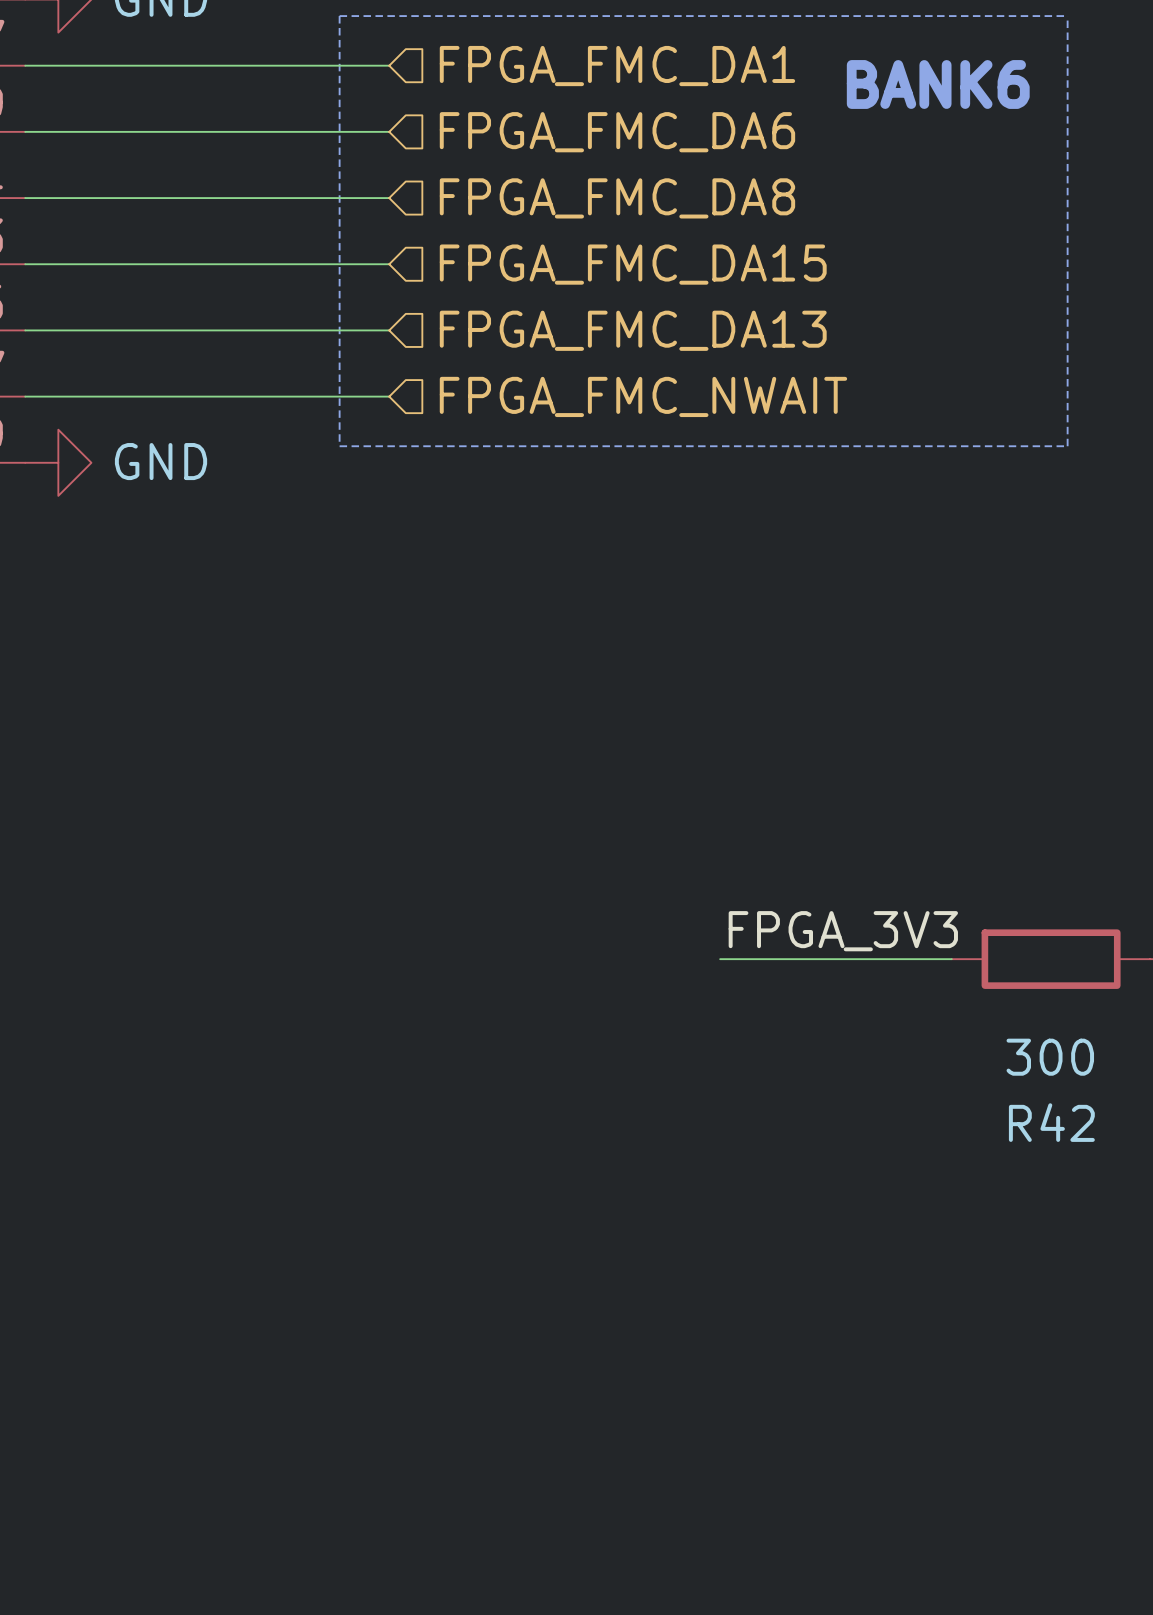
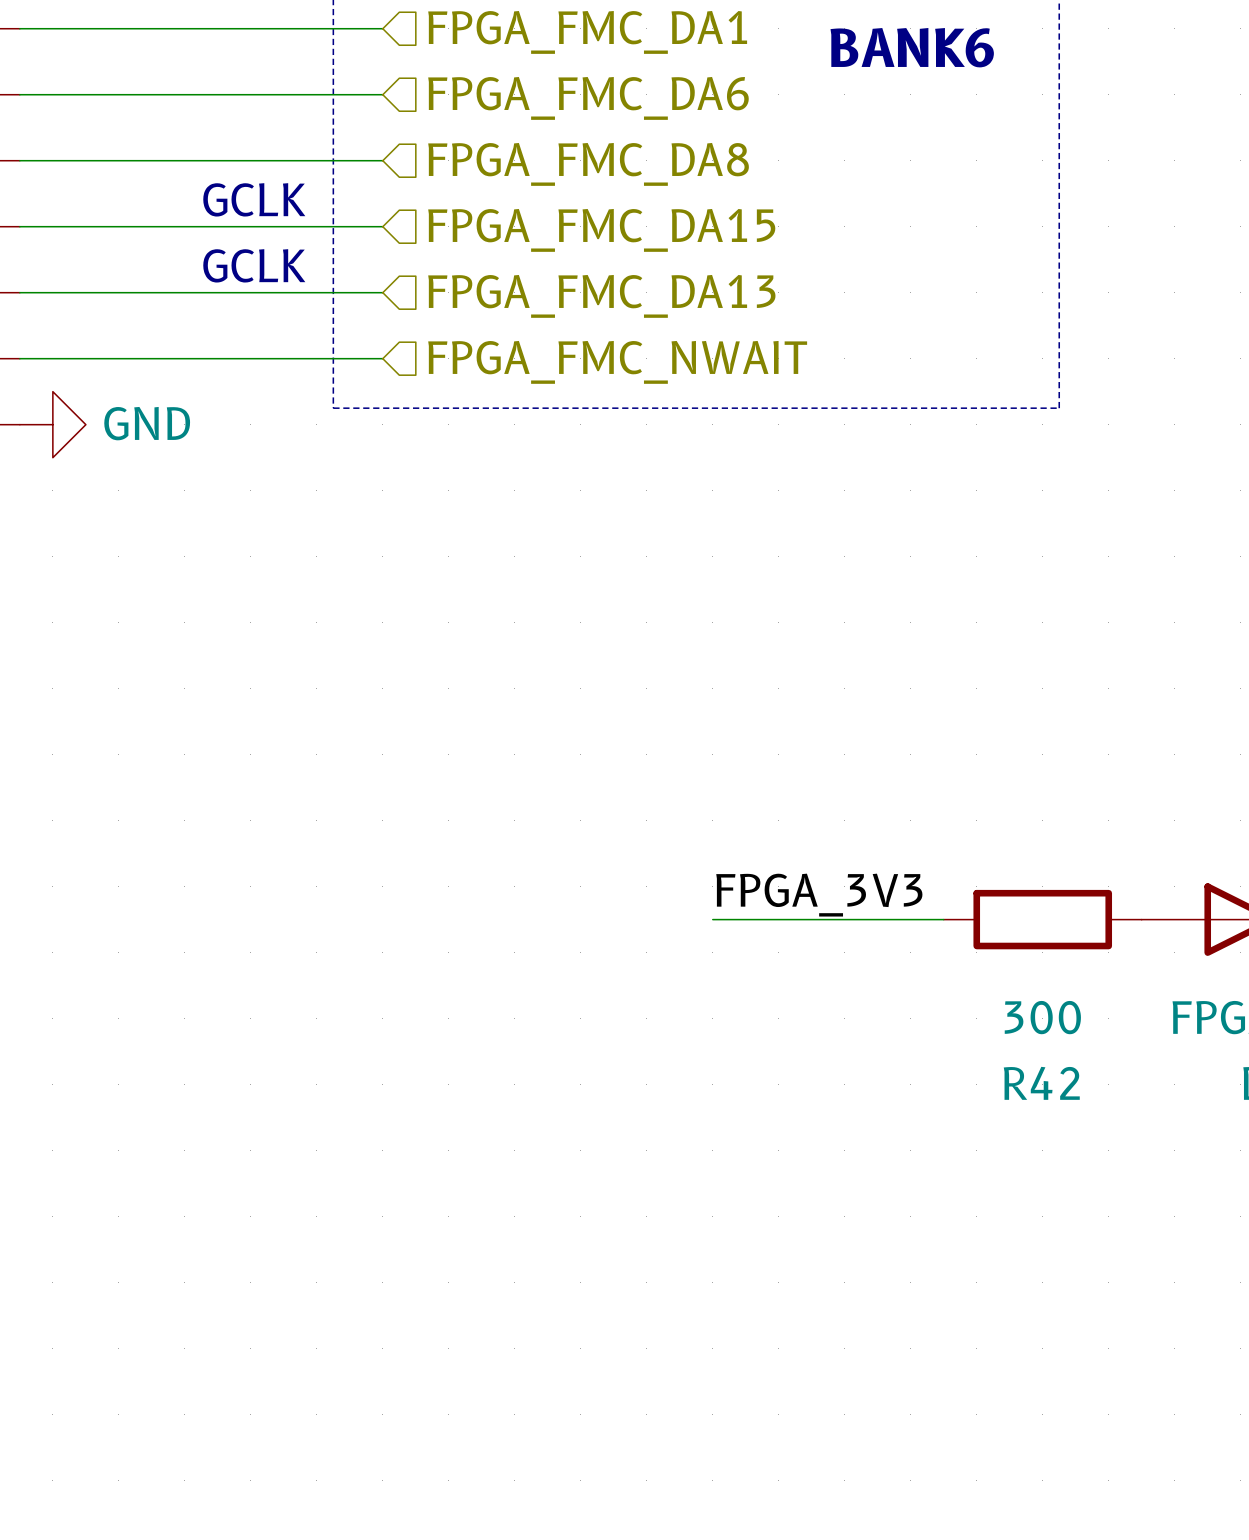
text: none -> GCLK (254, 199)
text: none -> GCLK (254, 265)

